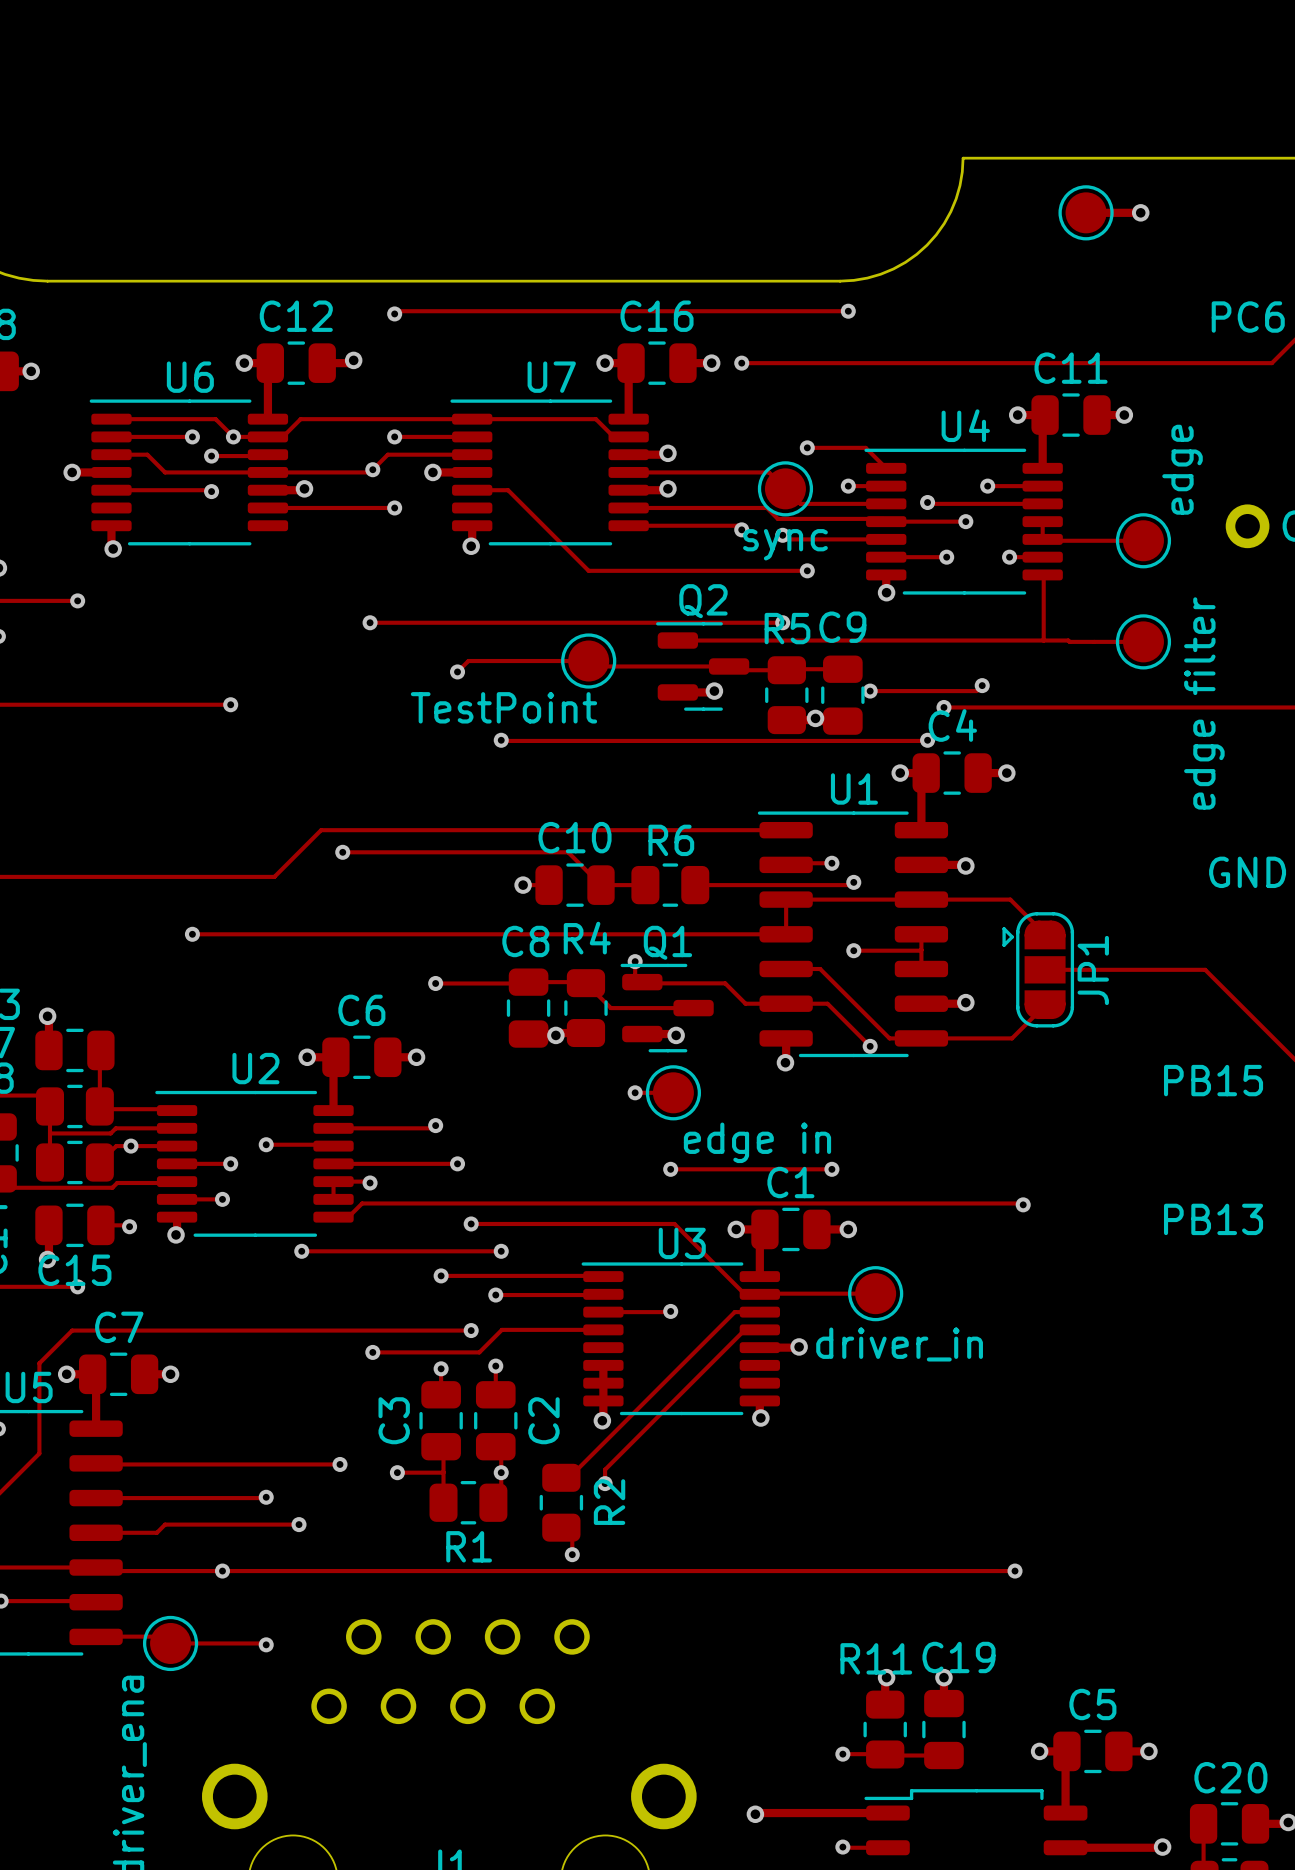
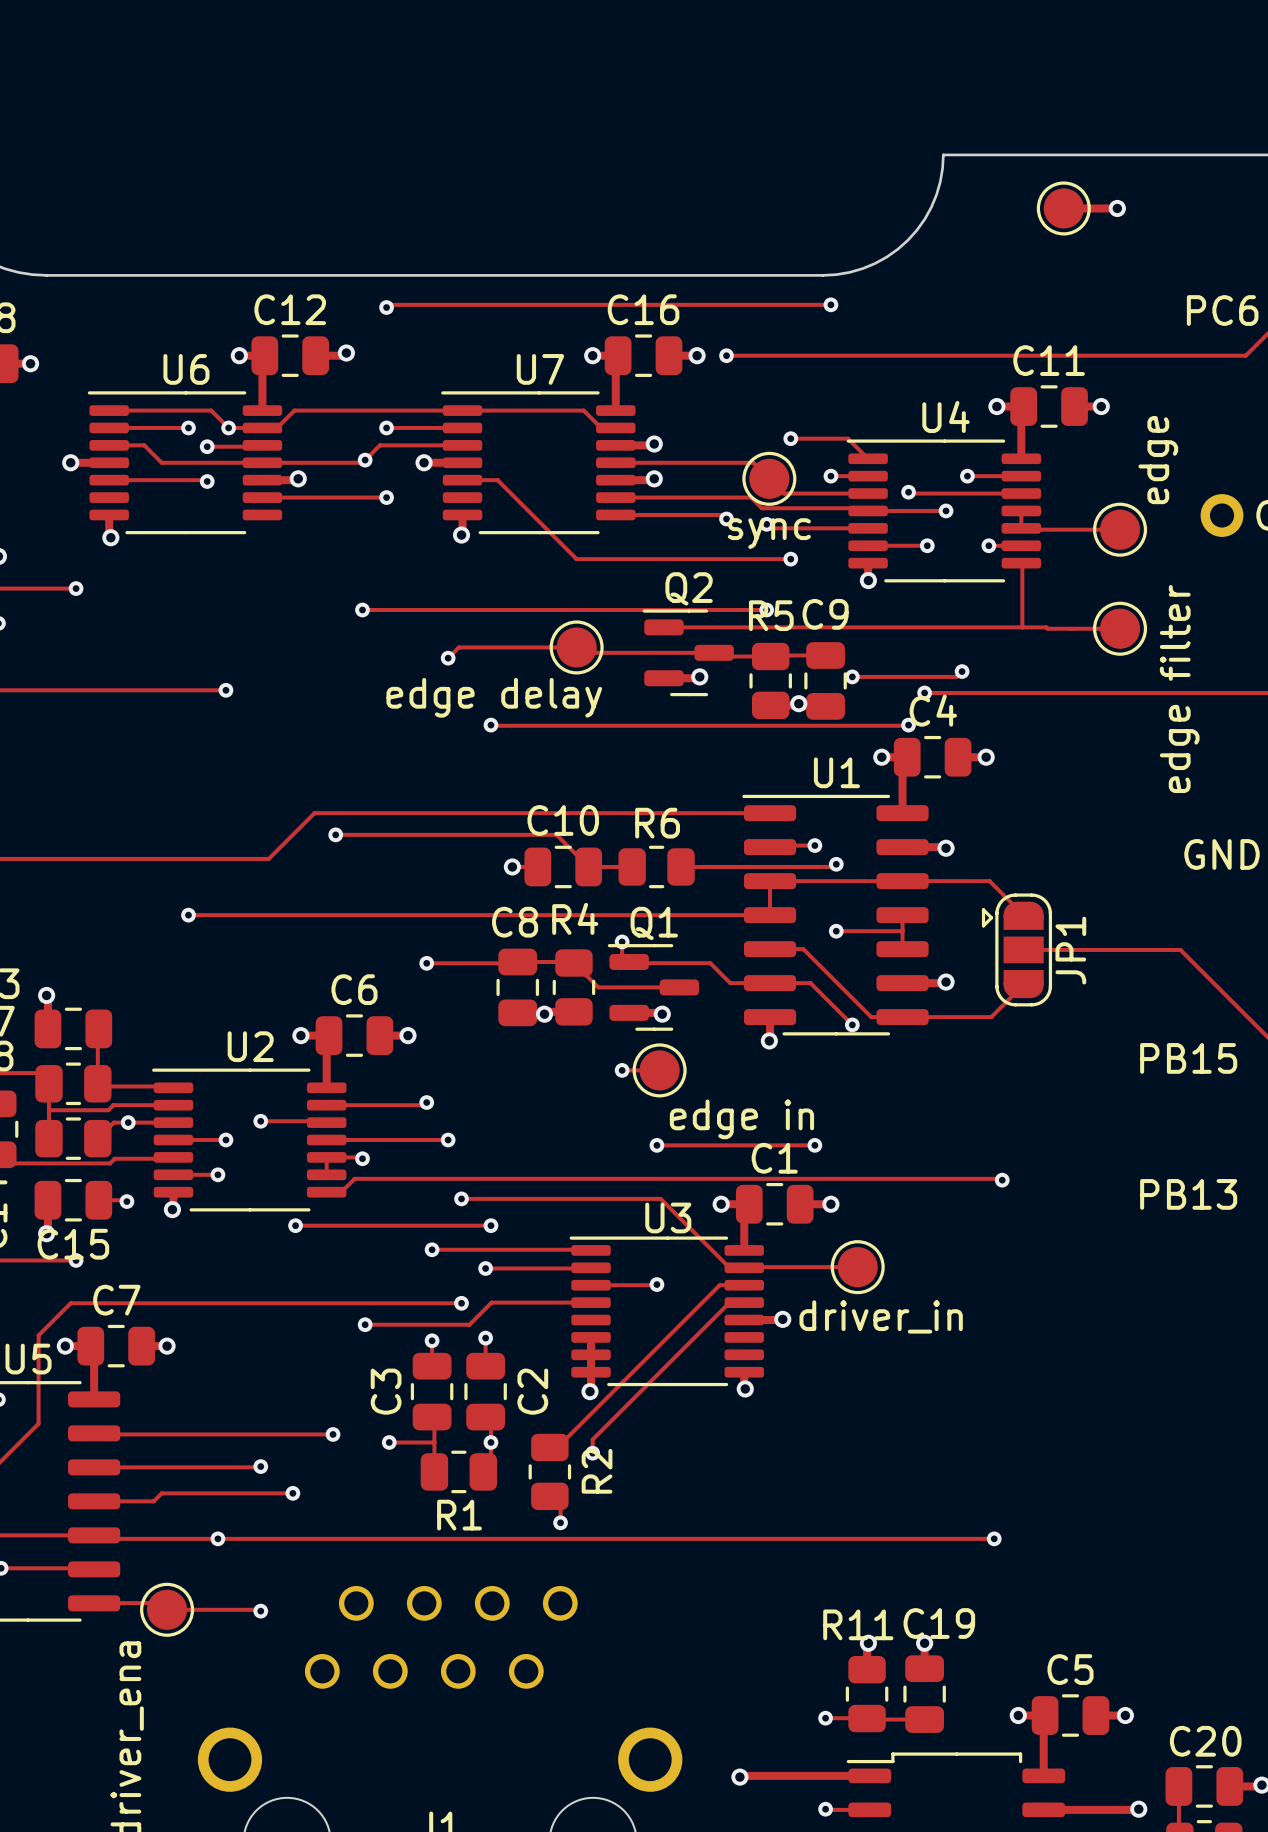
part value: TestPoint (503, 707) -> edge delay (494, 697)

